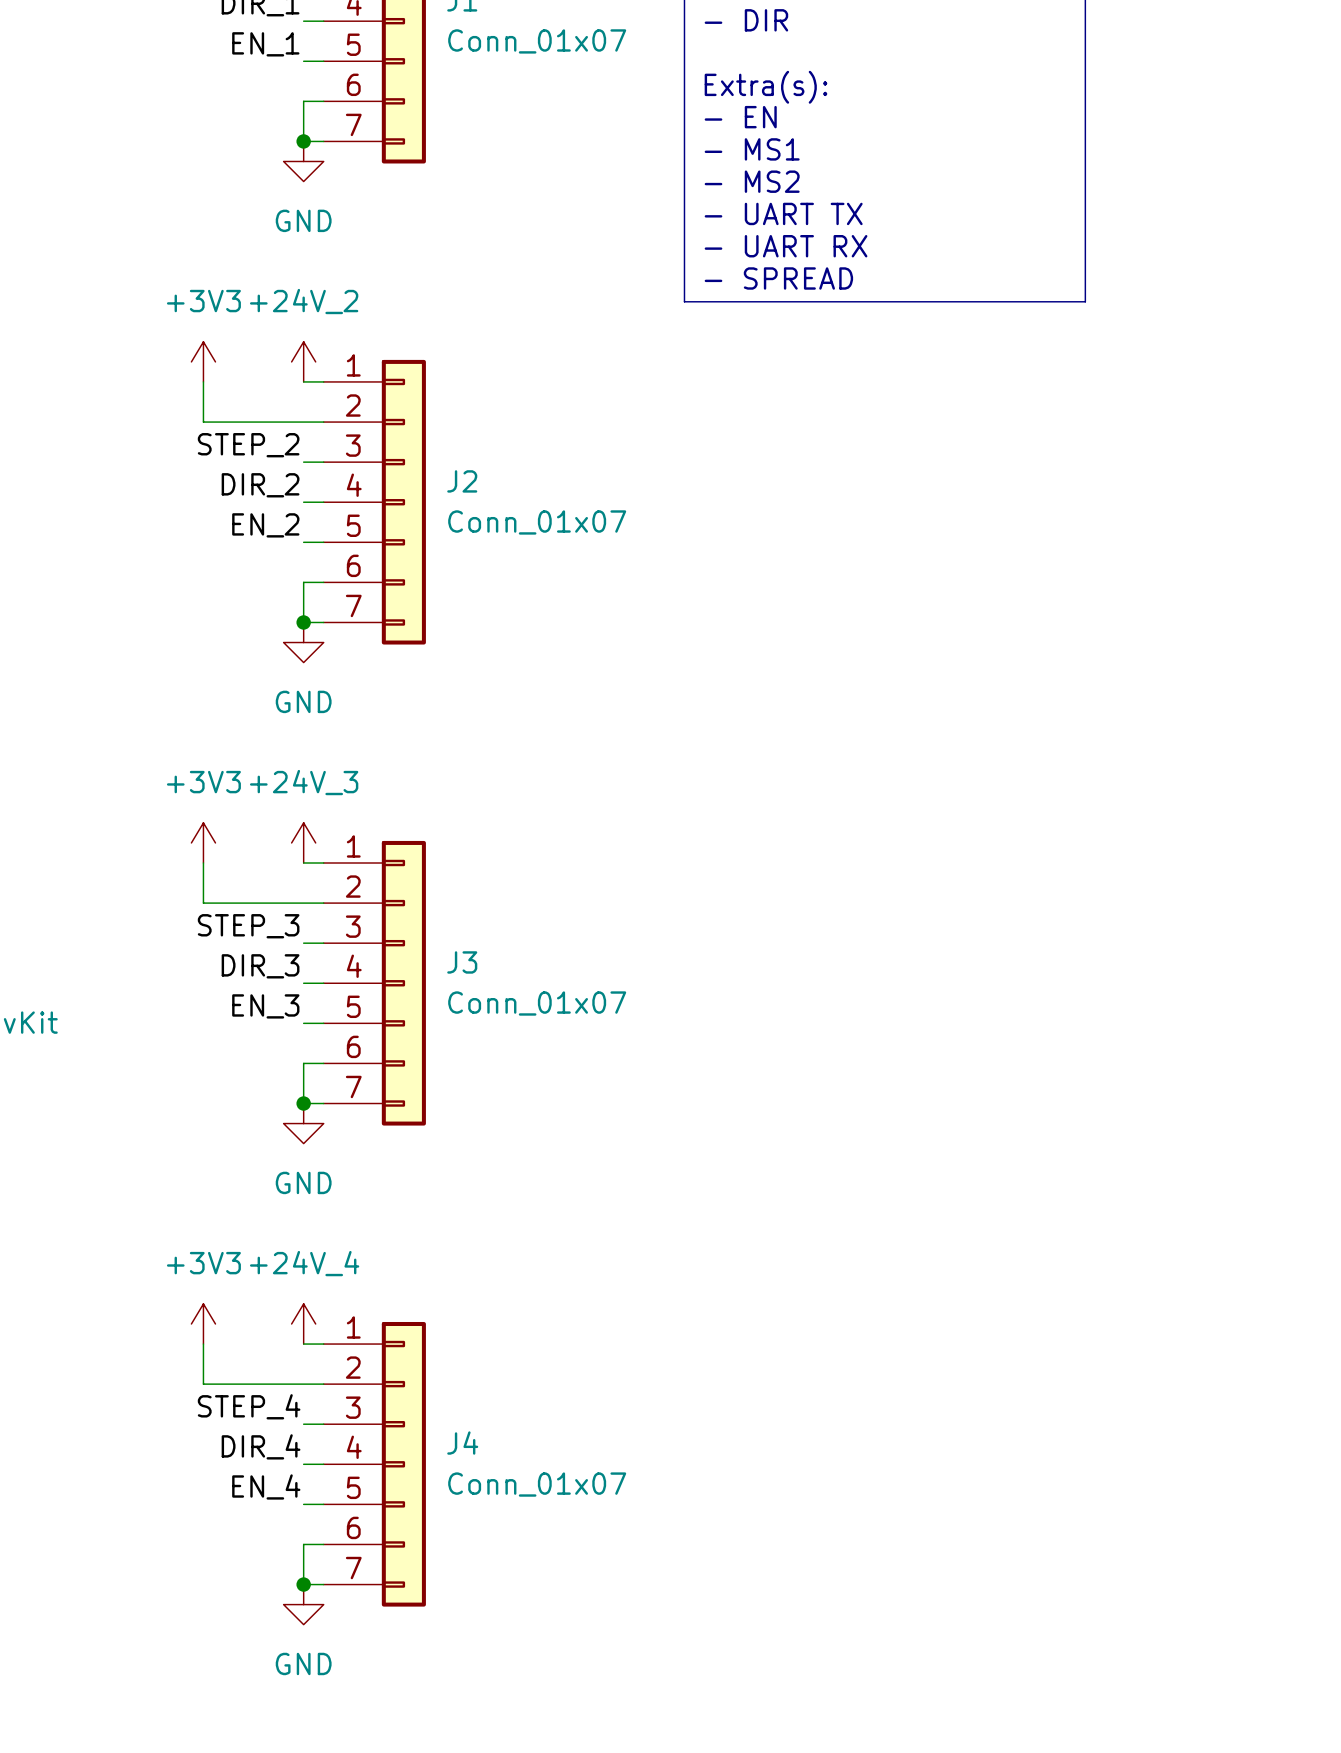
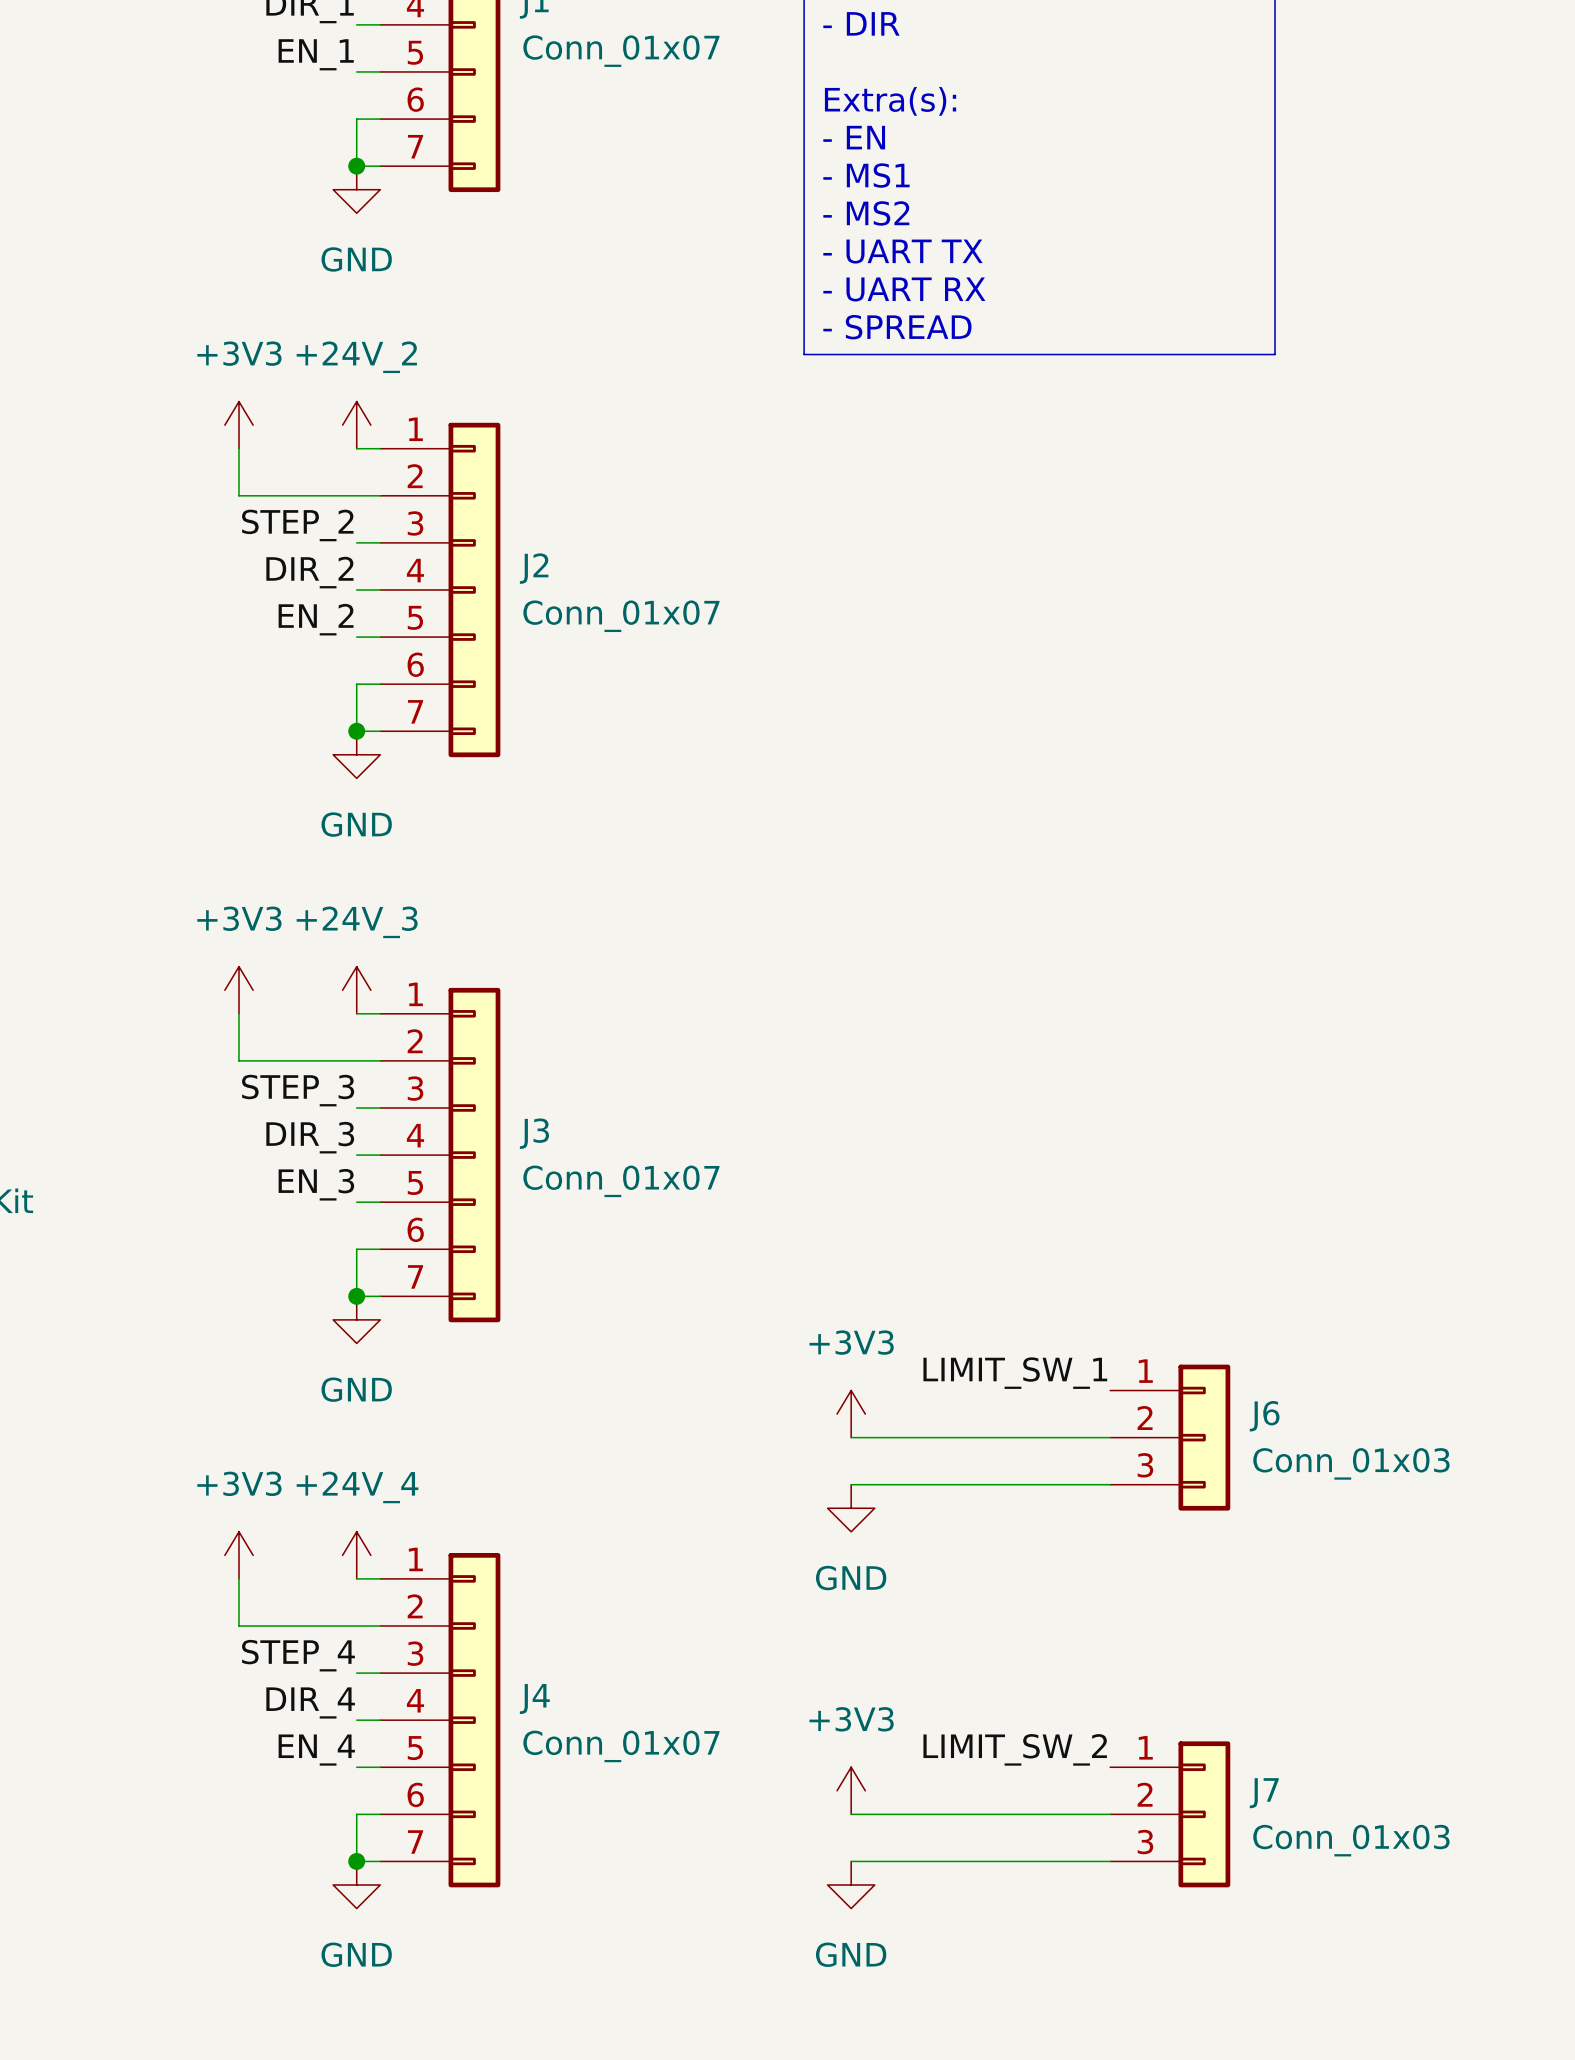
label: none -> LIMIT_SW_1 (1015, 1373)
power symbol: none -> +3V3 (851, 1414)
wire: none -> (851, 1437) (1110, 1437)
J6: none -> Conn_01x03 (1170, 1437)
wire: none -> (851, 1484) (1110, 1484)
power symbol: none -> GND (851, 1508)
label: none -> LIMIT_SW_2 (1015, 1749)
power symbol: none -> +3V3 (851, 1790)
wire: none -> (851, 1814) (1110, 1814)
J7: none -> Conn_01x03 (1170, 1814)
wire: none -> (851, 1861) (1110, 1861)
power symbol: none -> GND (851, 1884)

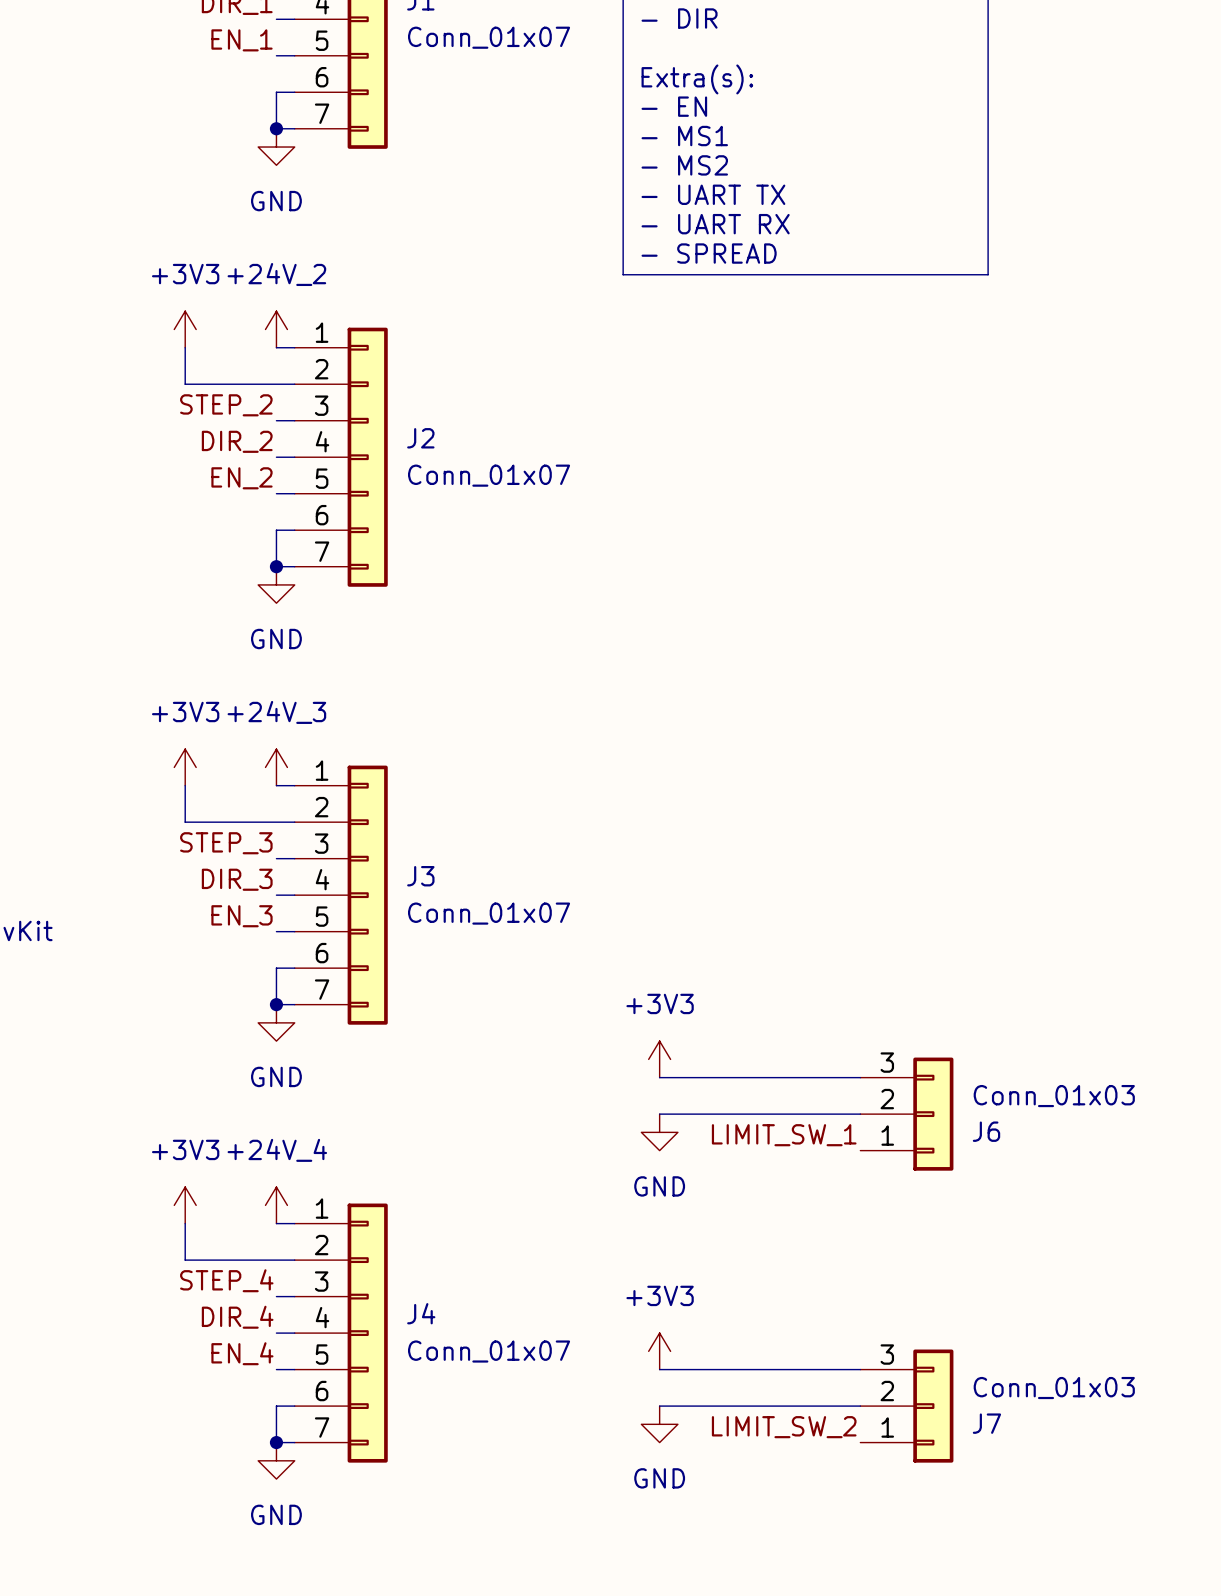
label position: LIMIT_SW_1 (1015, 1373) -> LIMIT_SW_1 (784, 1135)
power symbol position: +3V3 (851, 1414) -> +3V3 (659, 1059)
J6 flip: as is (1204, 1437) -> up-down (933, 1114)
wire: (851, 1484) (1110, 1484) -> (659, 1077) (860, 1077)
power symbol position: GND (851, 1508) -> GND (659, 1132)
label position: LIMIT_SW_2 (1015, 1749) -> LIMIT_SW_2 (784, 1427)
power symbol position: +3V3 (851, 1790) -> +3V3 (659, 1351)
J7 flip: as is (1204, 1814) -> up-down (933, 1406)
wire: (851, 1861) (1110, 1861) -> (659, 1369) (860, 1369)
power symbol position: GND (851, 1884) -> GND (659, 1424)

